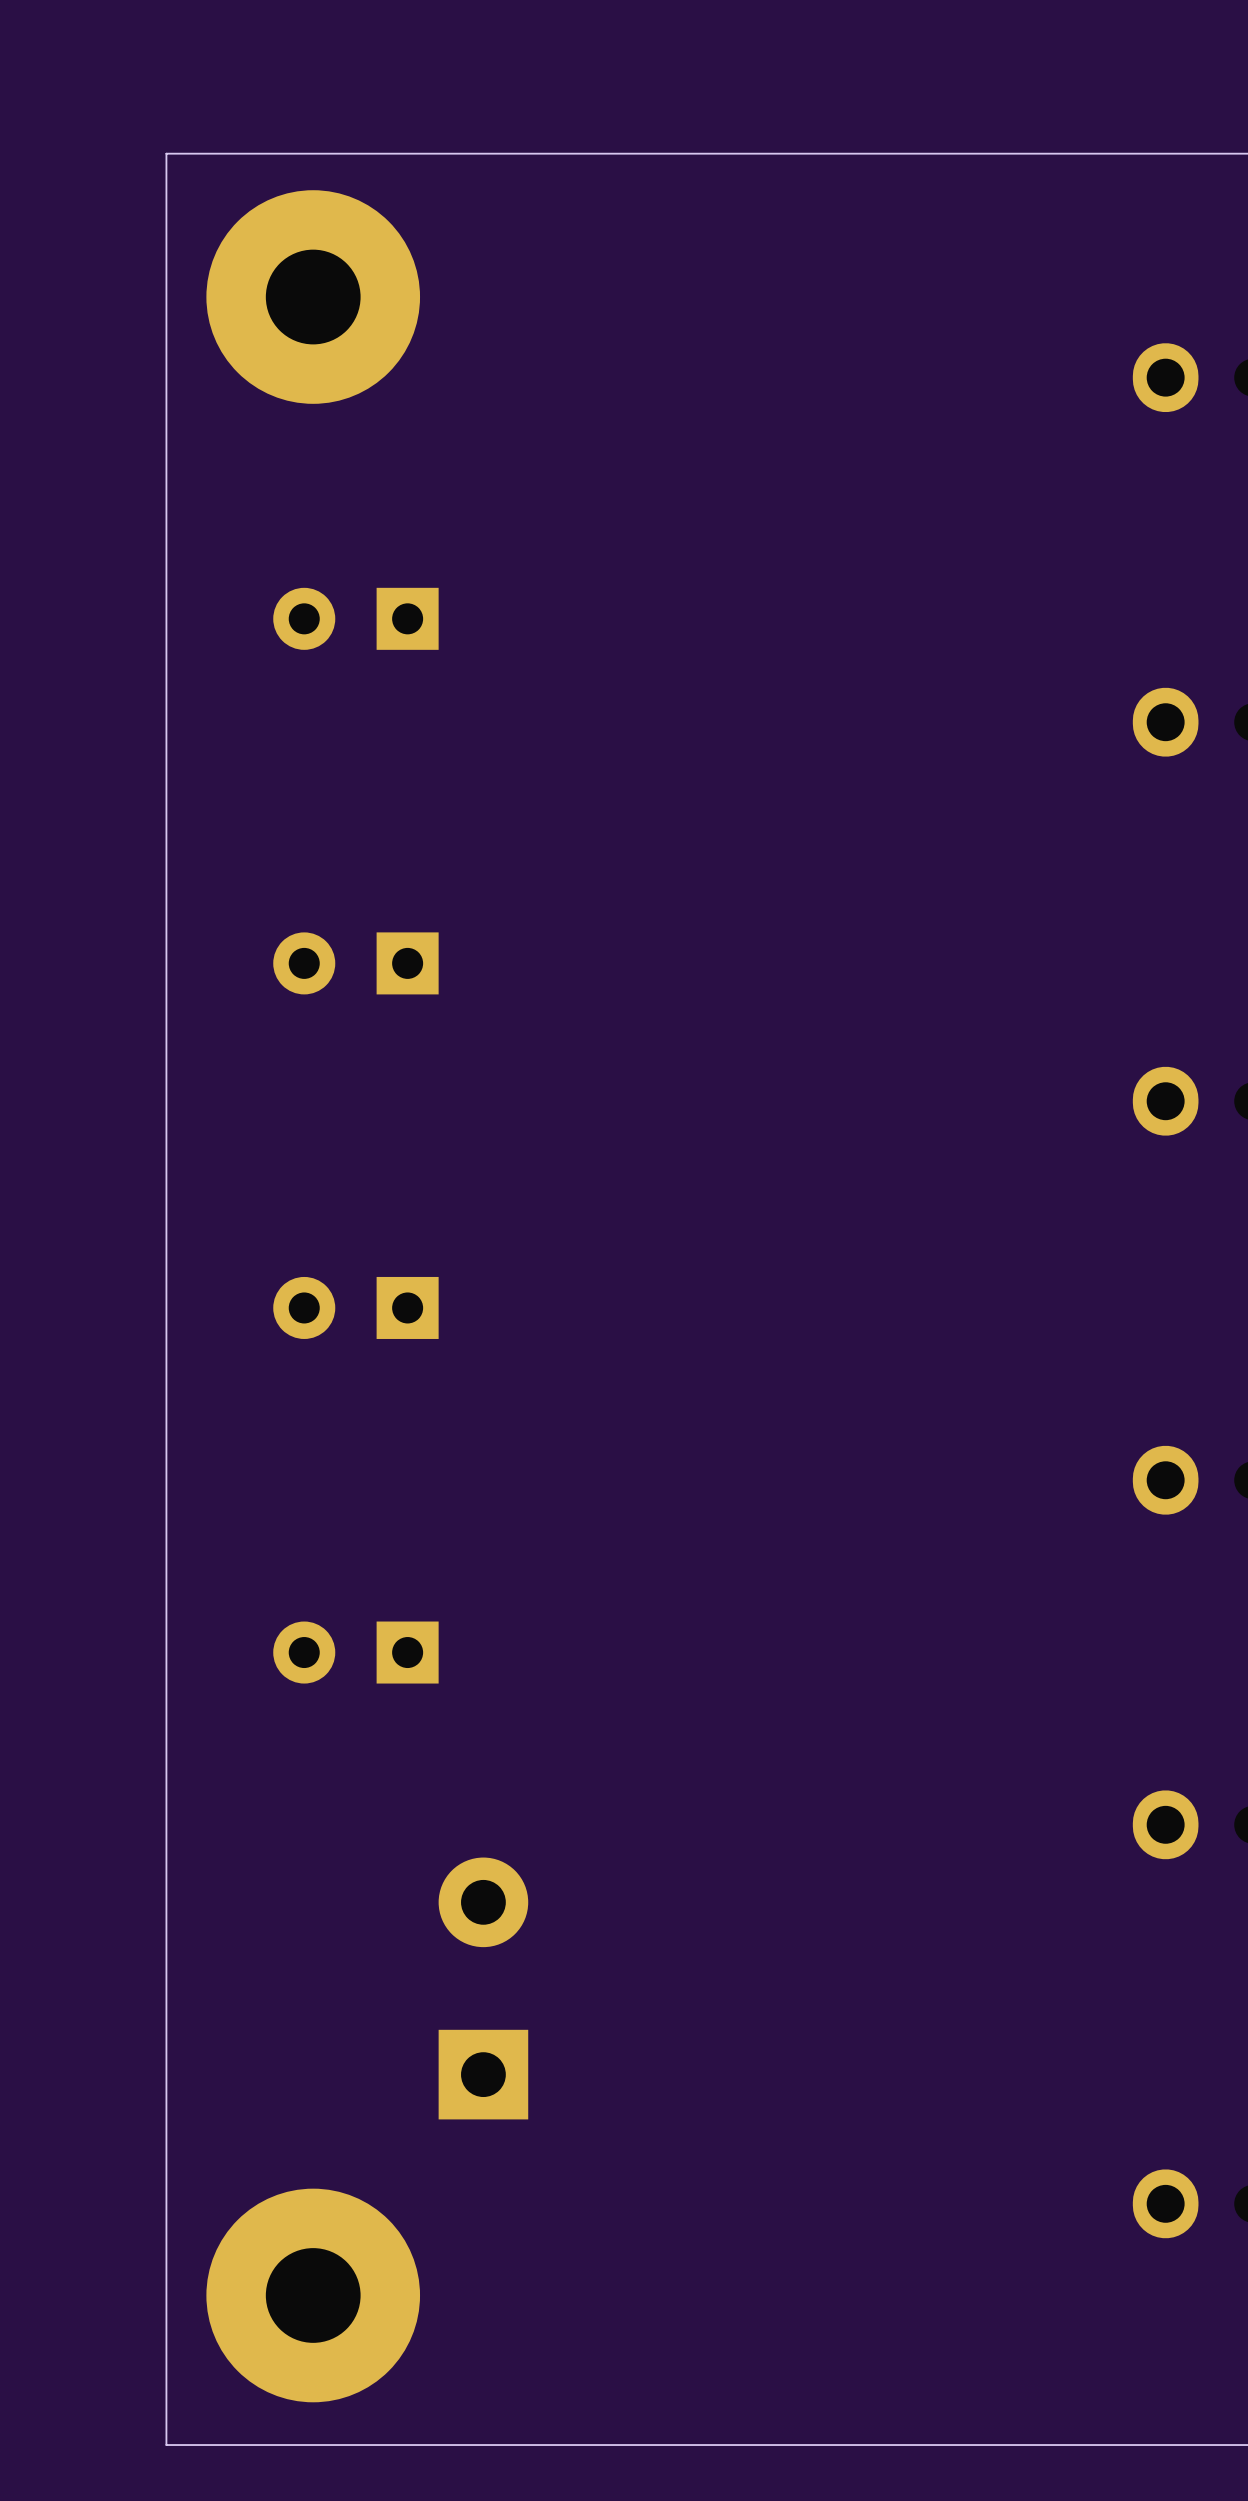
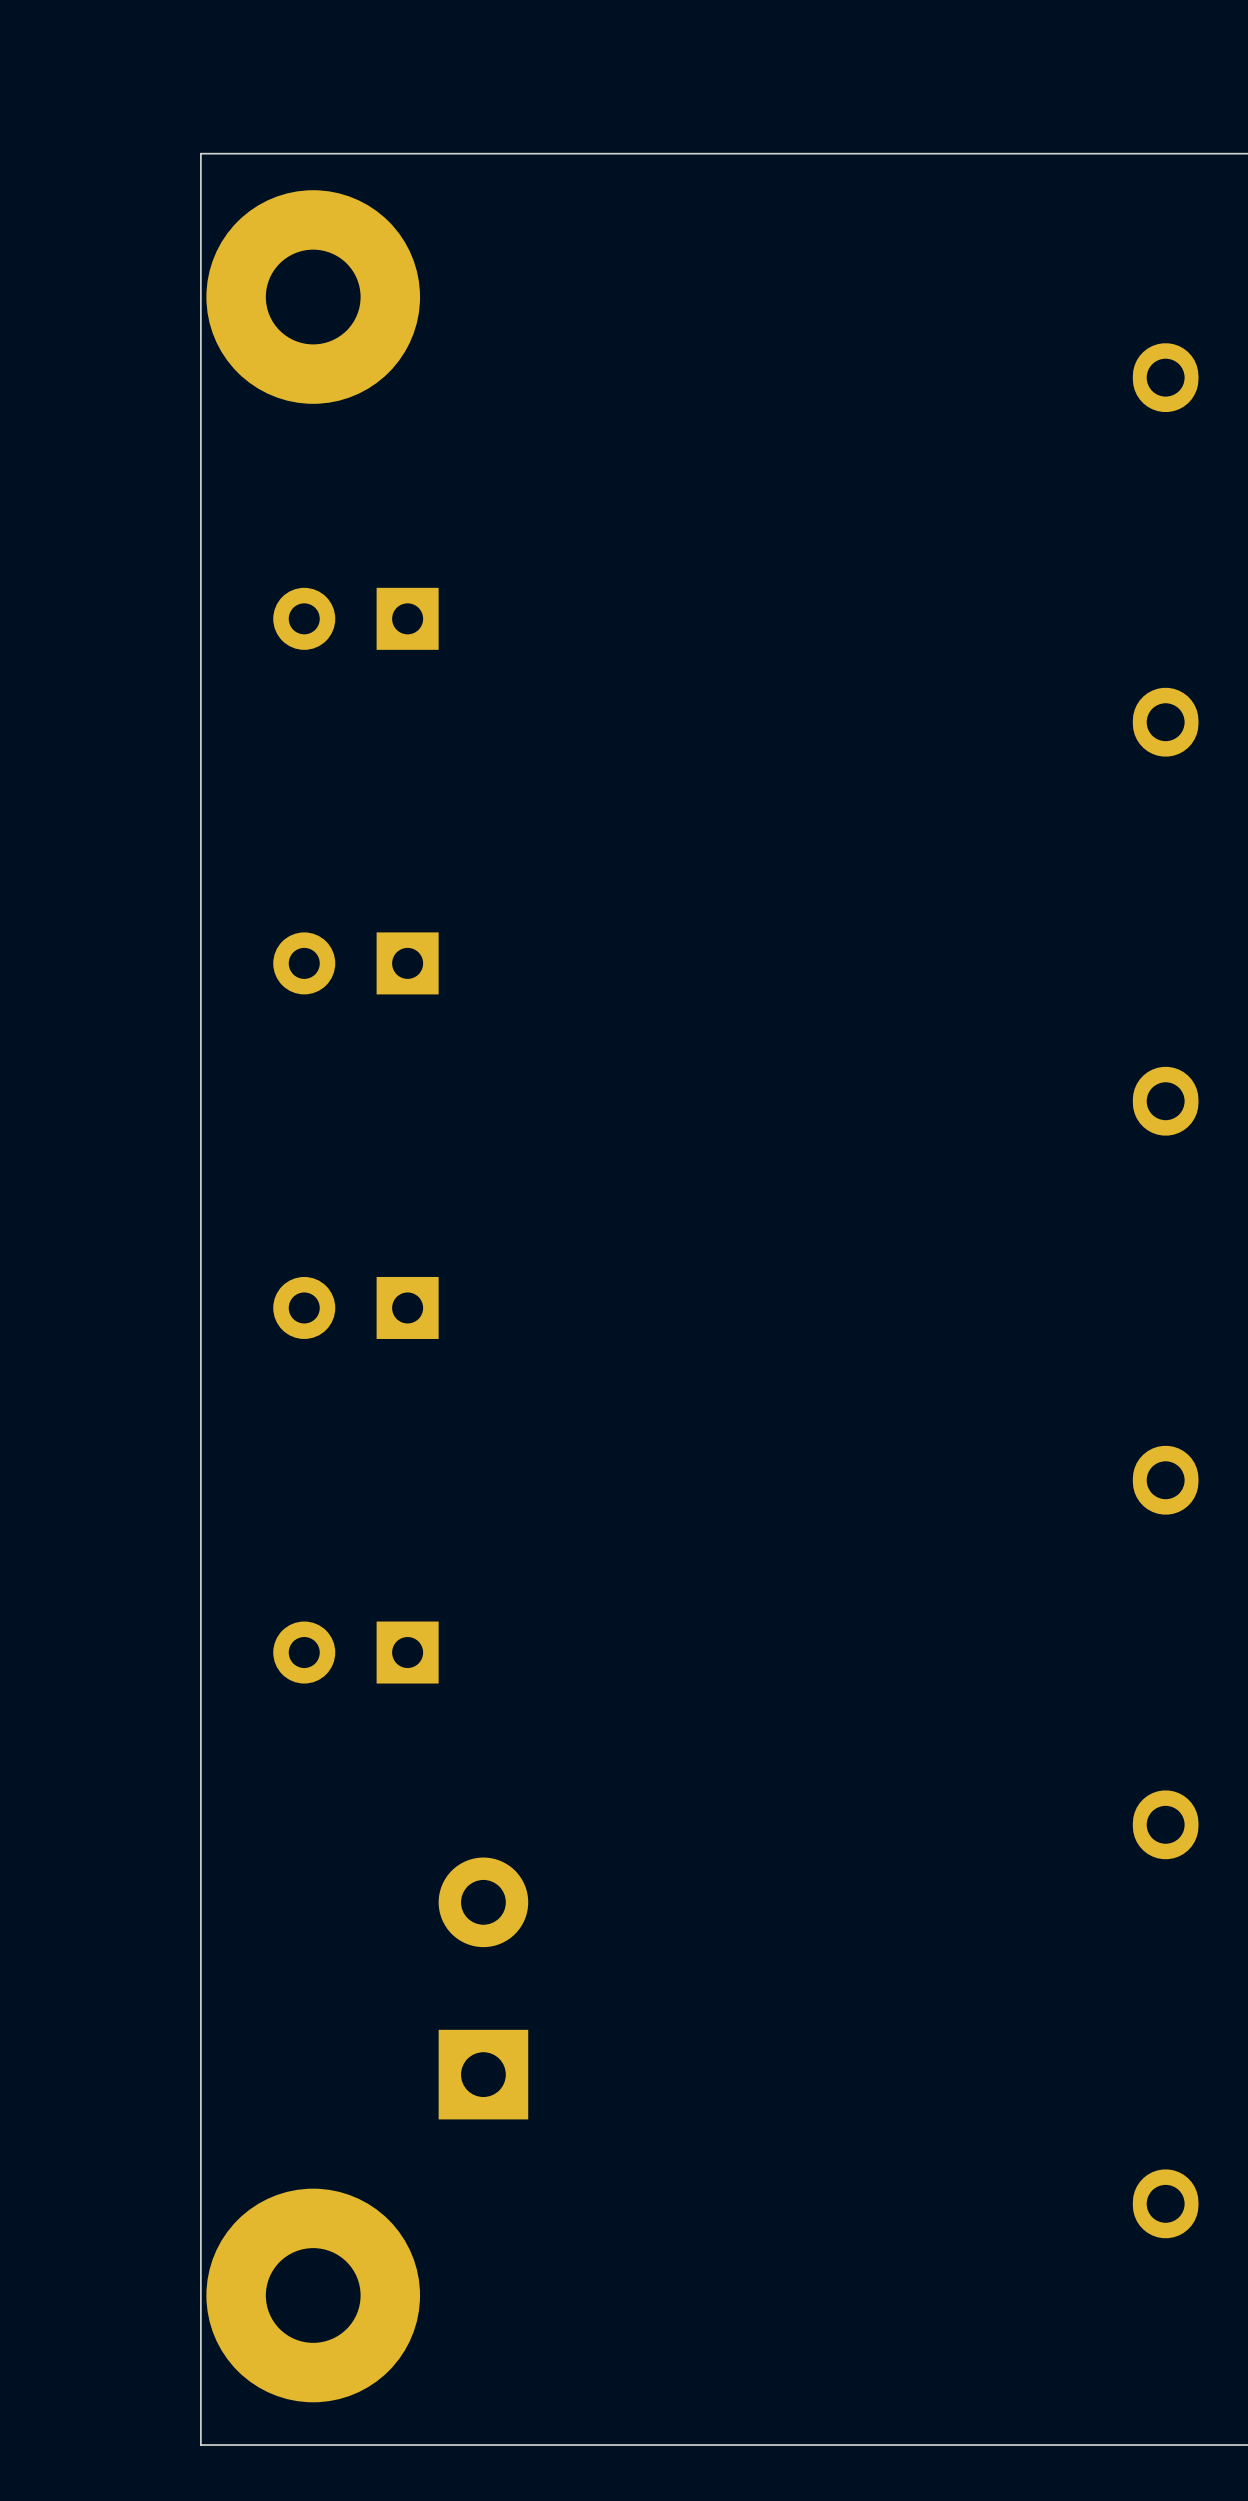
board edge: (200, 153) (166, 153) (166, 2445) (200, 2445) -> (200, 153) (200, 2445)

